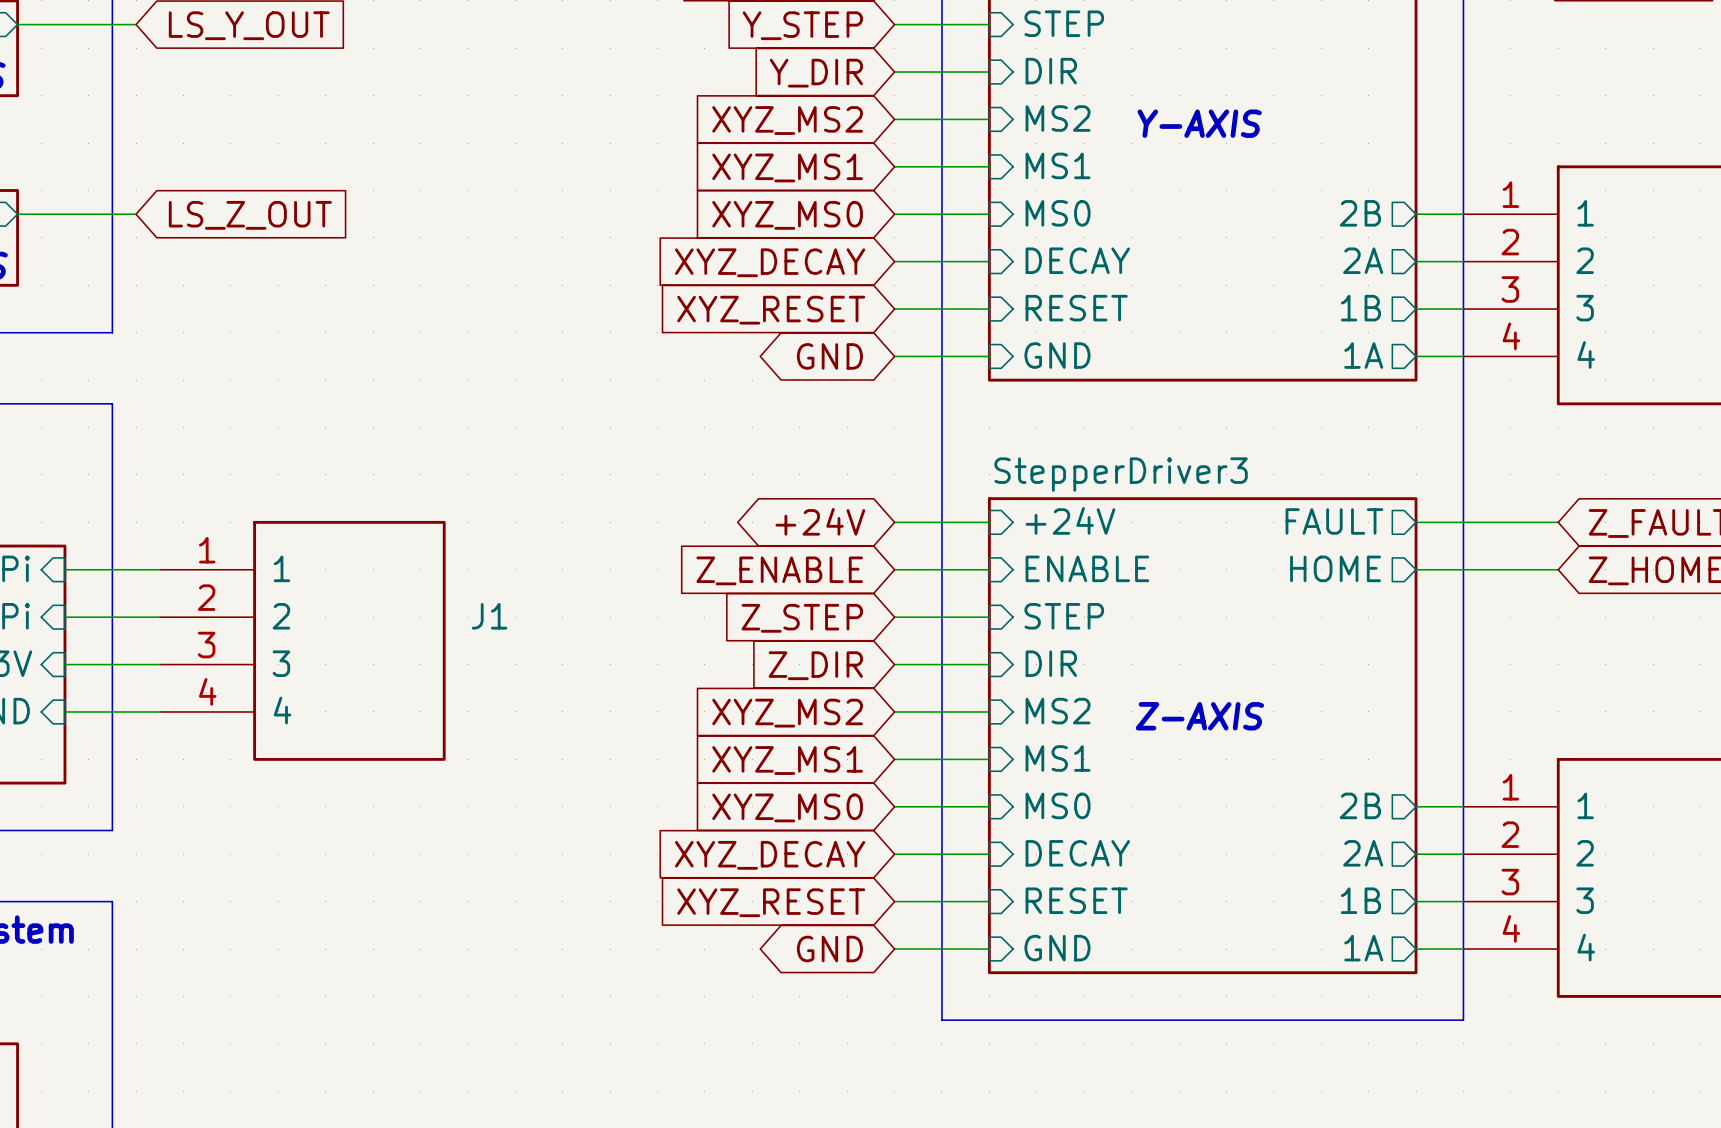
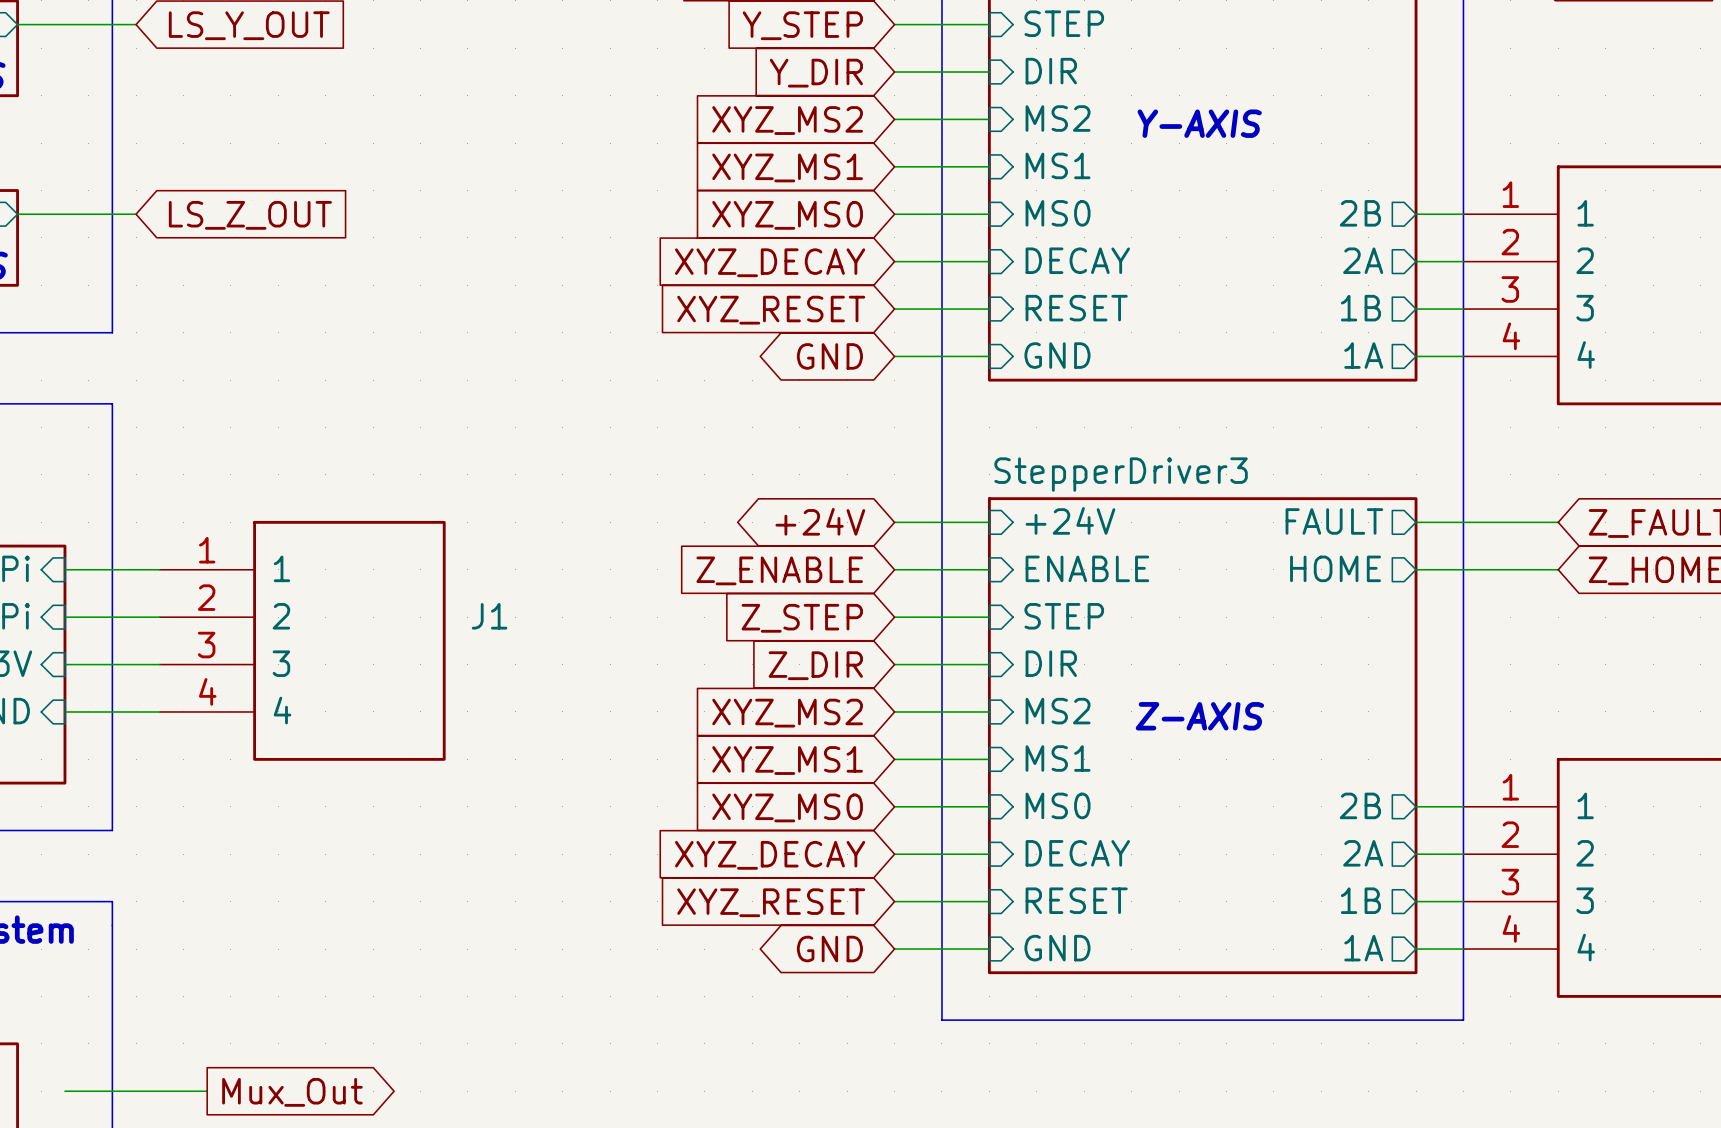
wire: none -> (64, 1091) (207, 1091)
global label: none -> Mux_Out (292, 1092)

